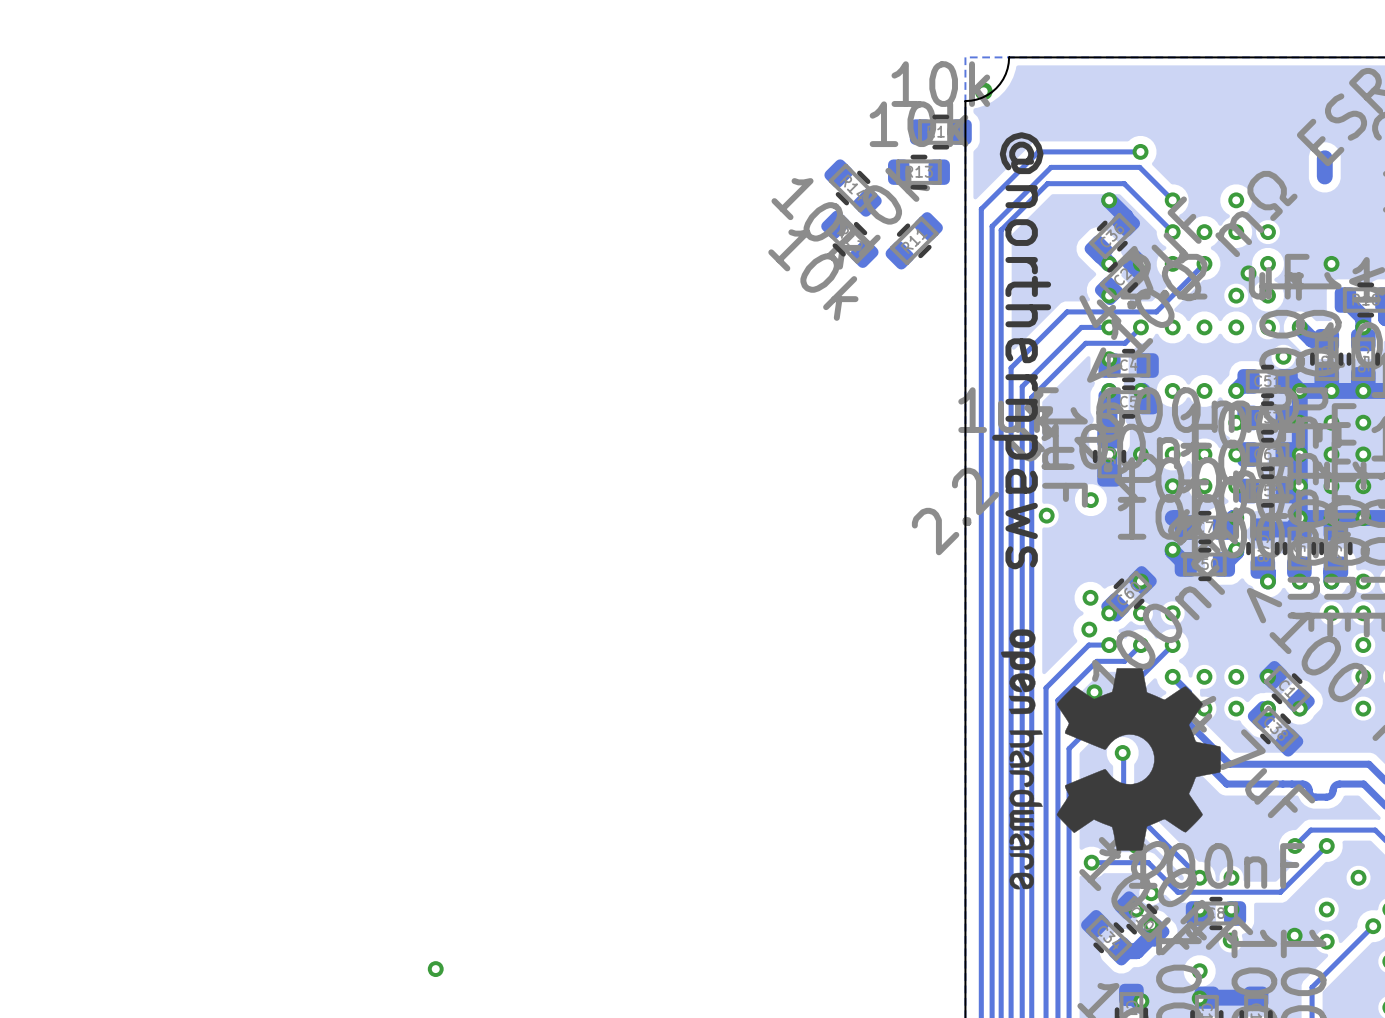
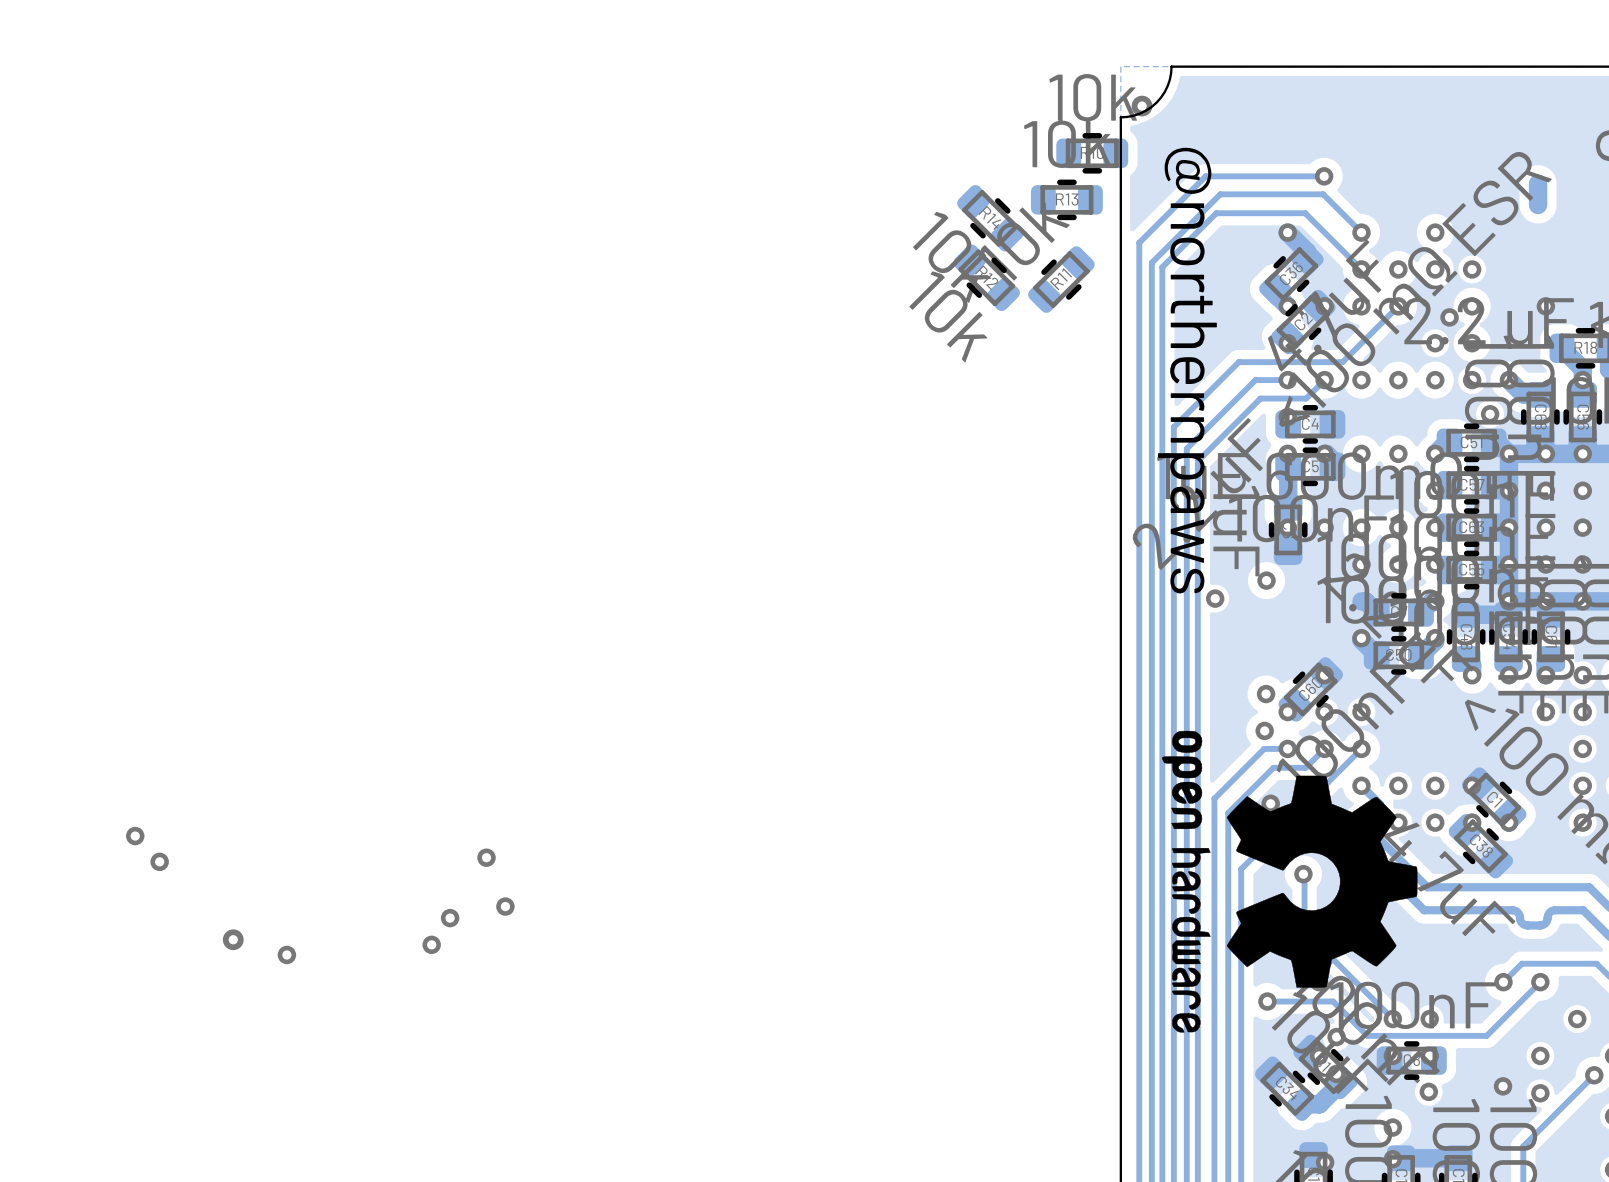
via: none -> (135, 836)
via: none -> (486, 857)
via: none -> (159, 861)
via: none -> (505, 906)
via: none -> (450, 918)
via: none -> (233, 939)
via: none -> (431, 944)
via: none -> (286, 954)
via: (435, 969) -> none

